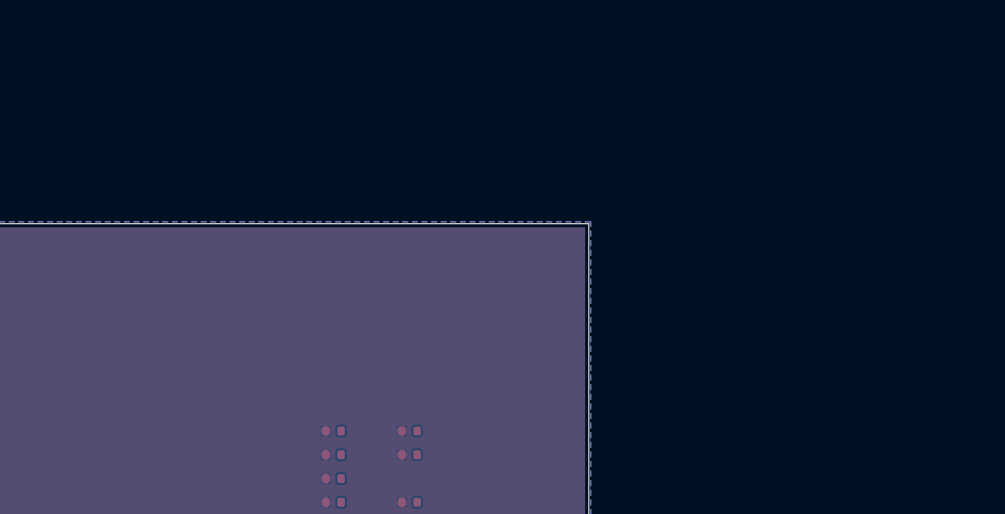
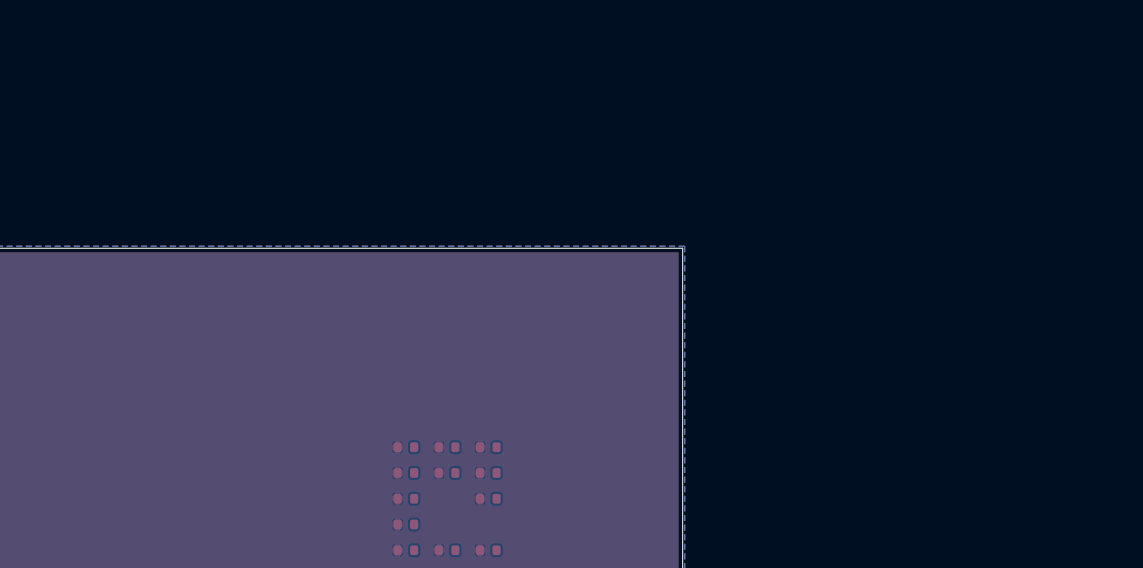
part: none -> (405, 447)
part: none -> (447, 447)
part: none -> (488, 447)
part: none -> (447, 472)
part: none -> (447, 550)

